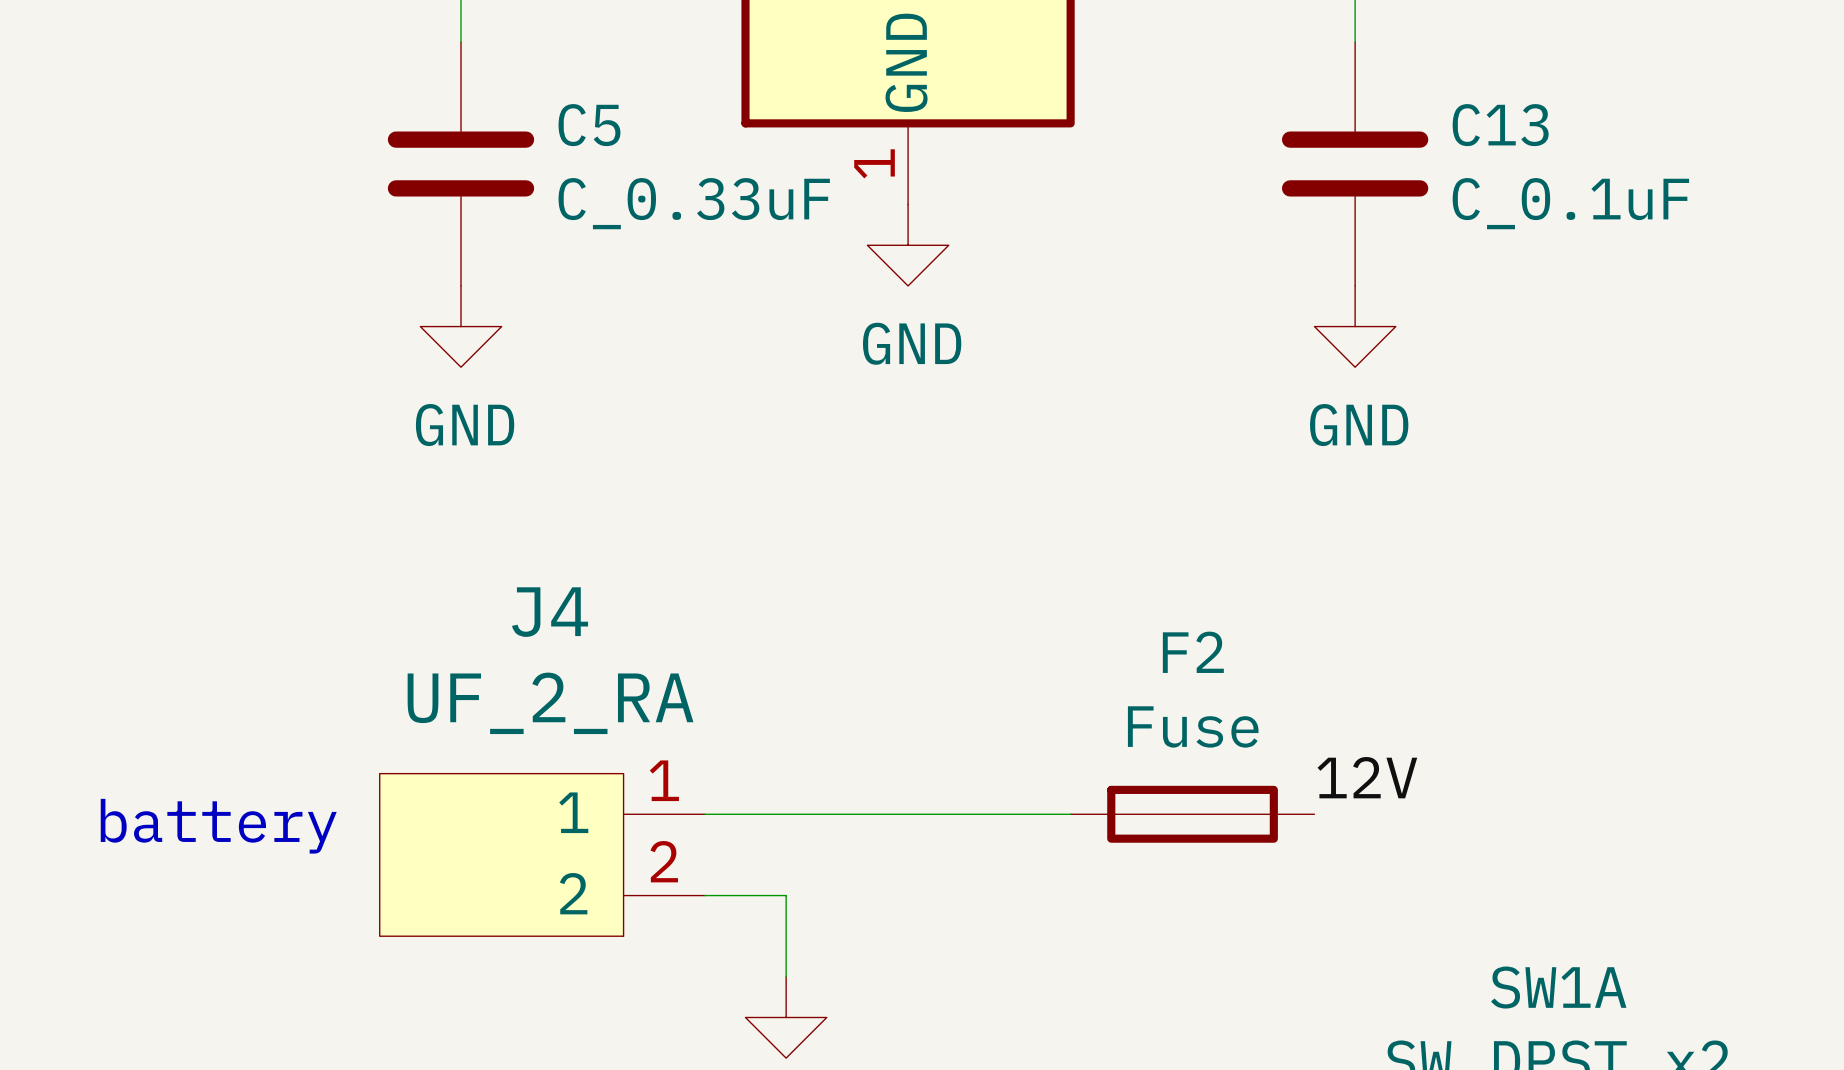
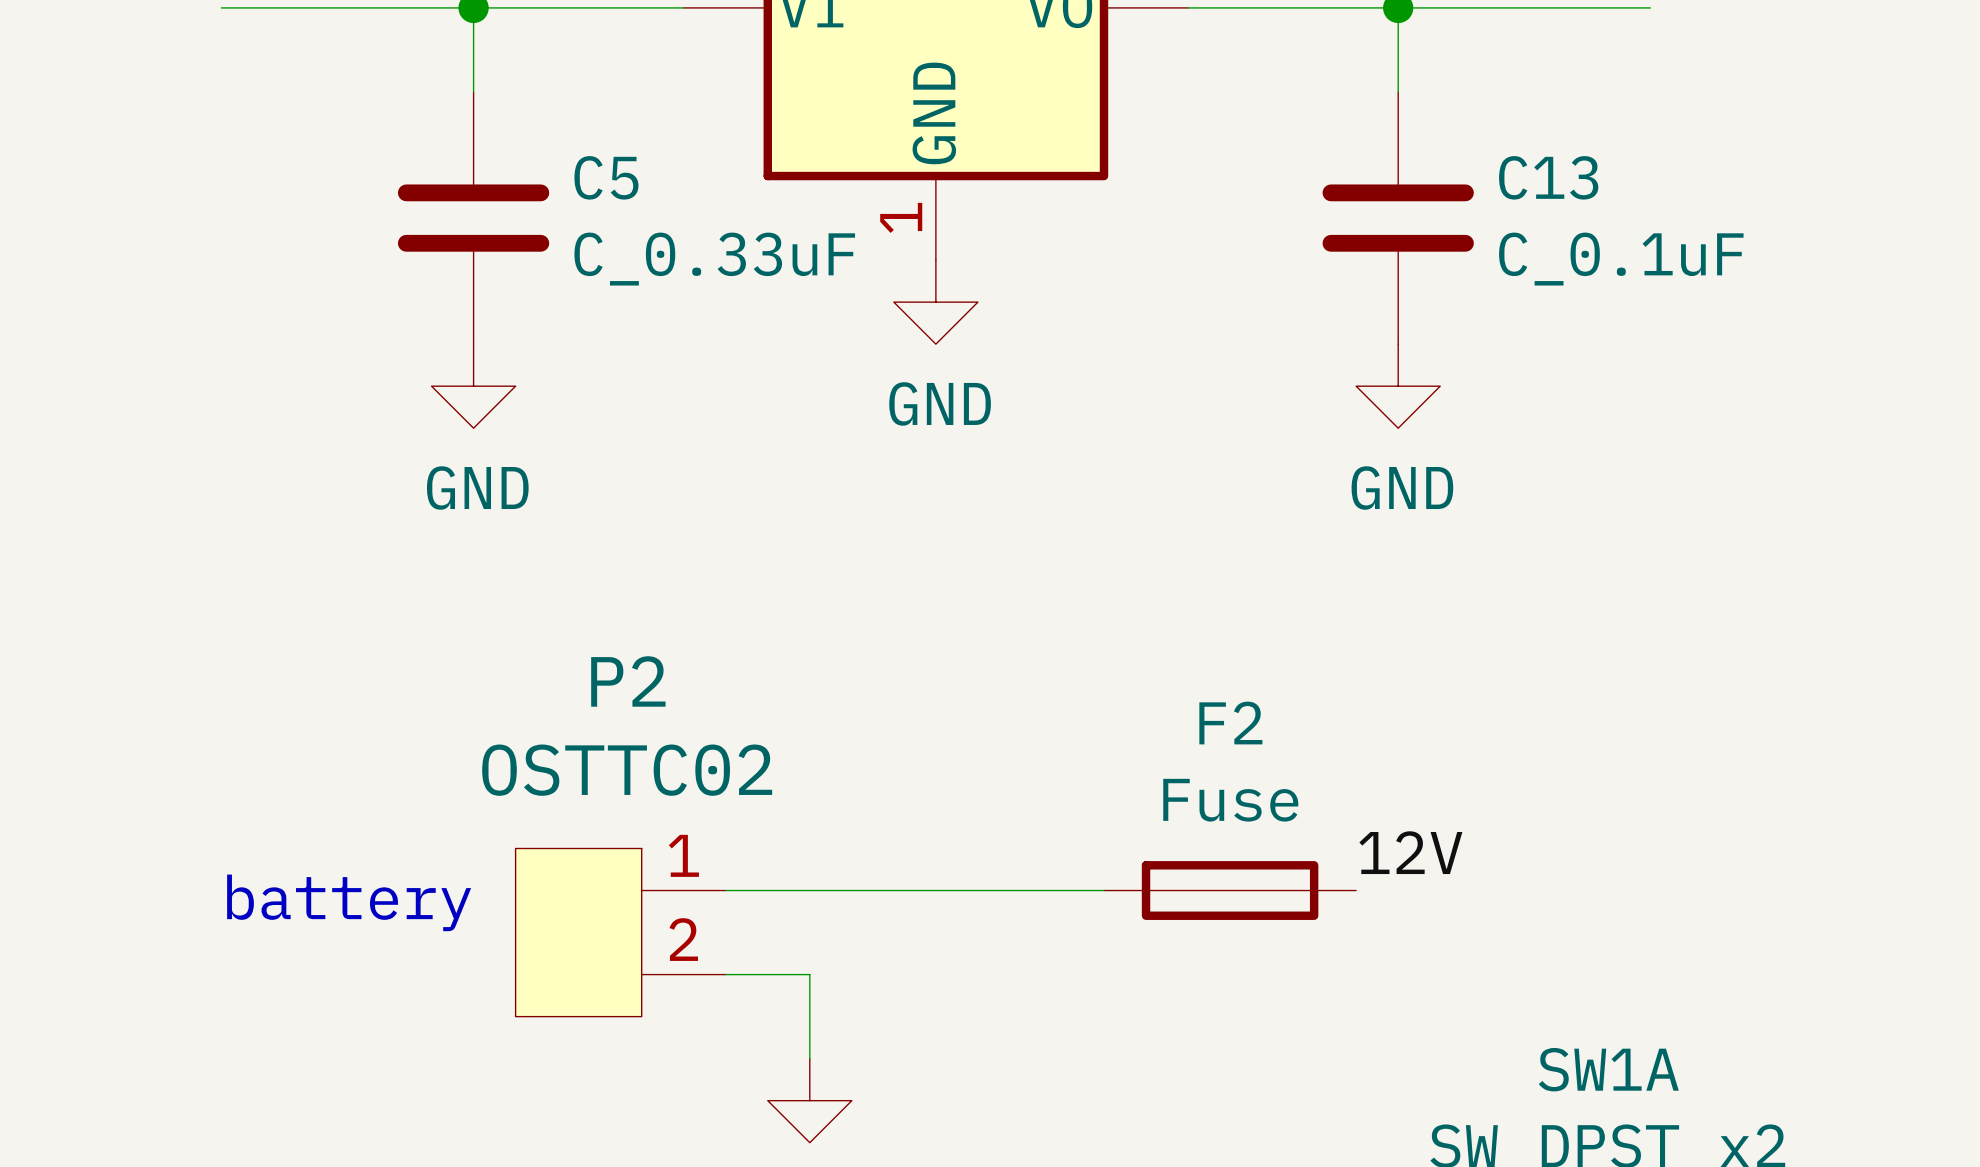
text position: battery (218, 826) -> battery (349, 902)
J4: UF_2_RA (542, 854) -> none
P2: none -> OSTTC02 (620, 932)

